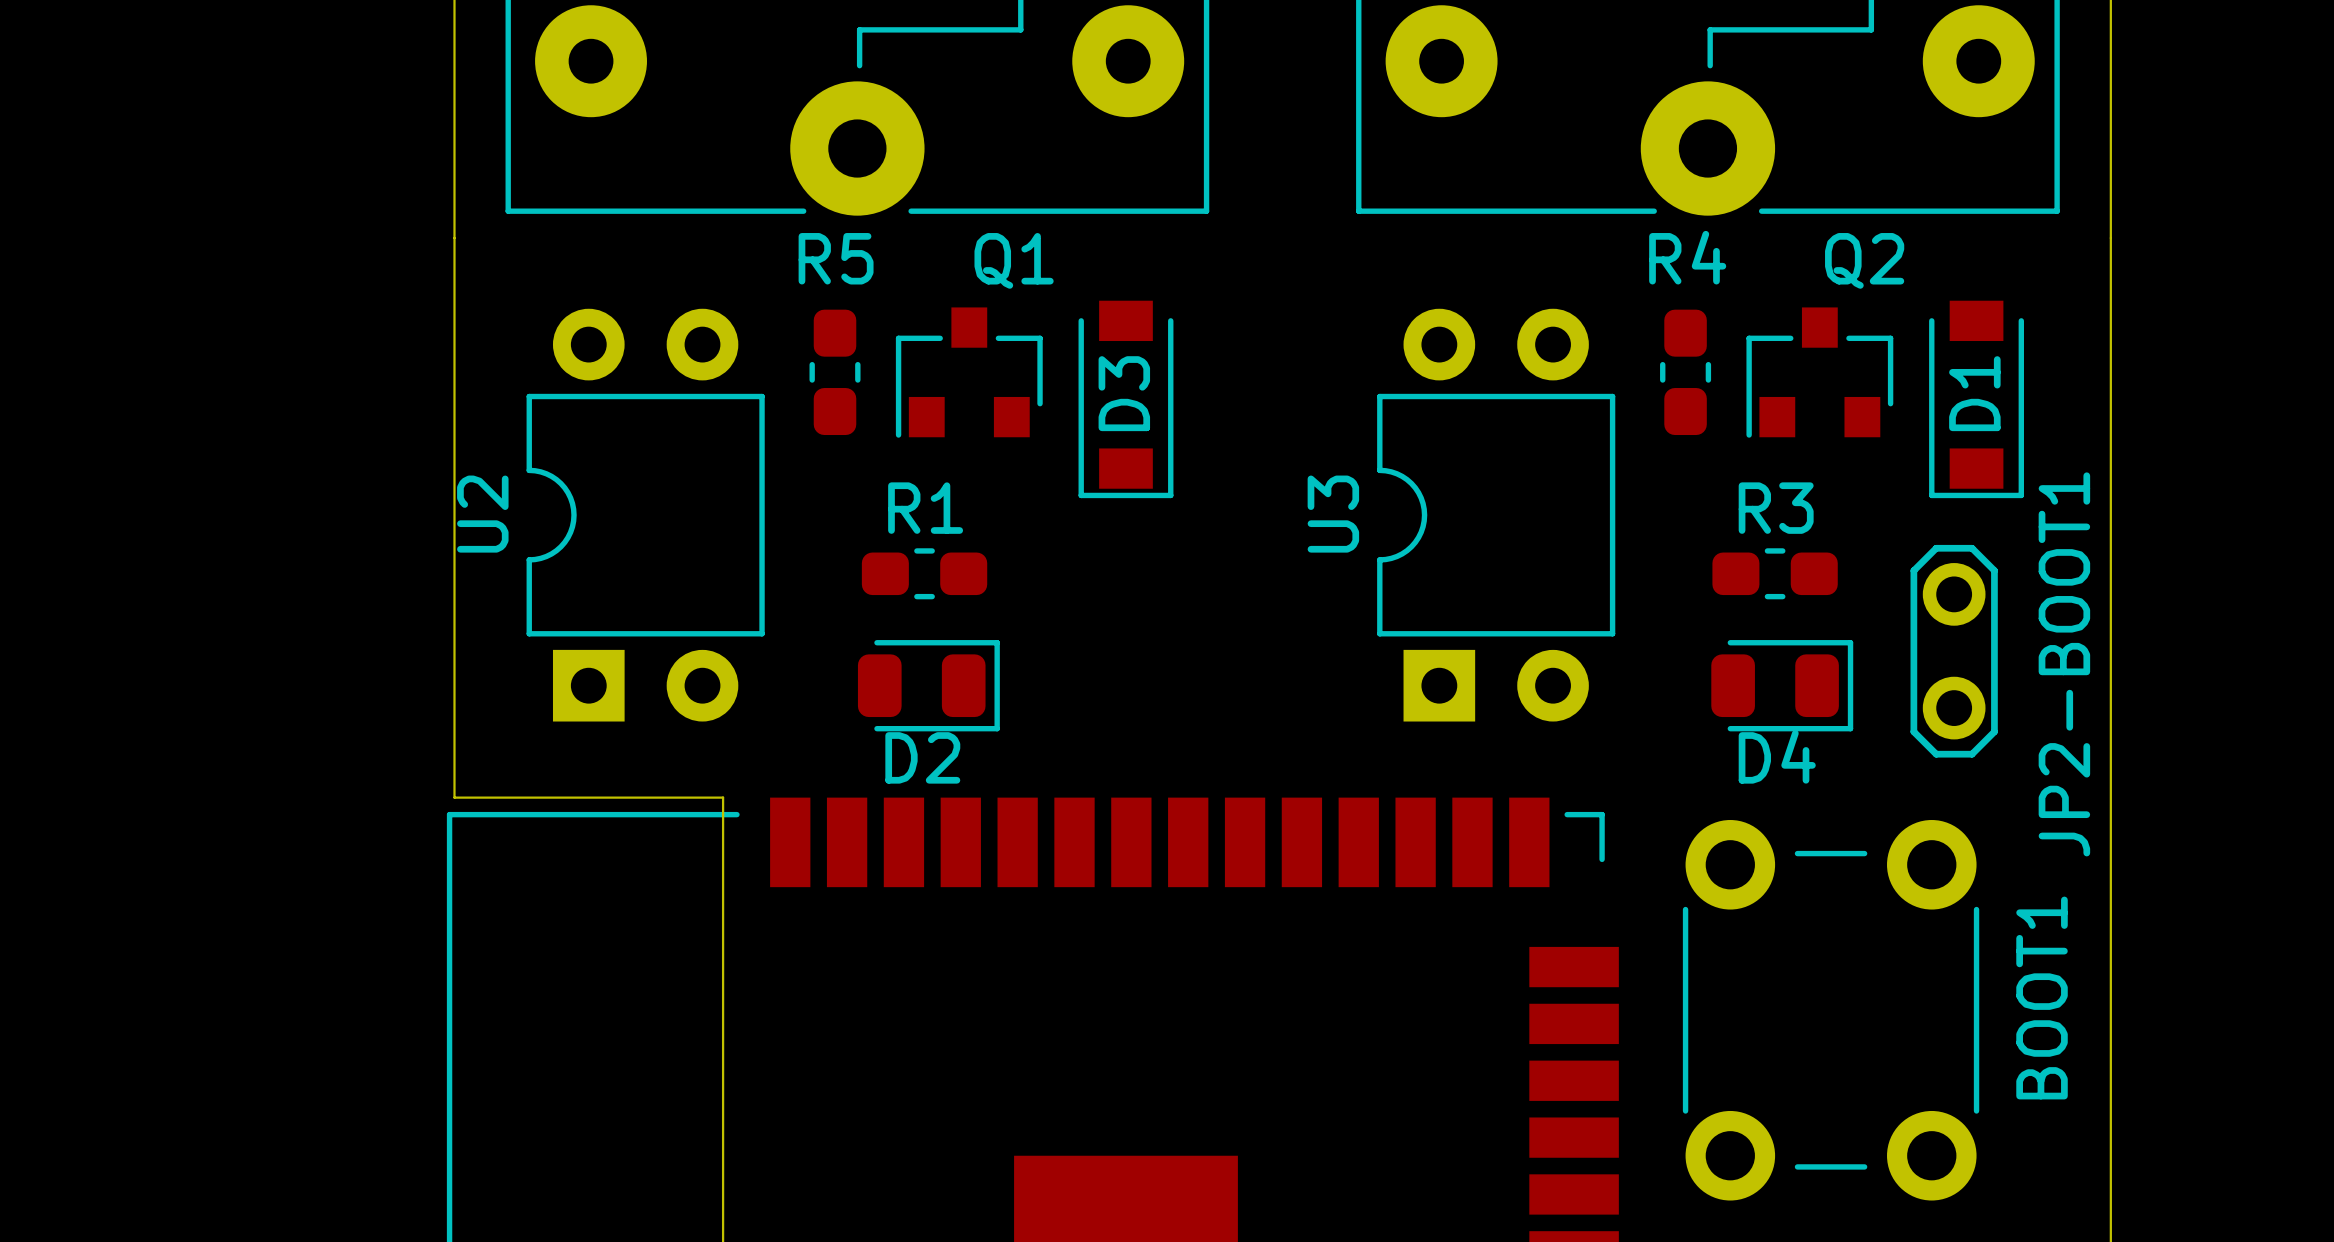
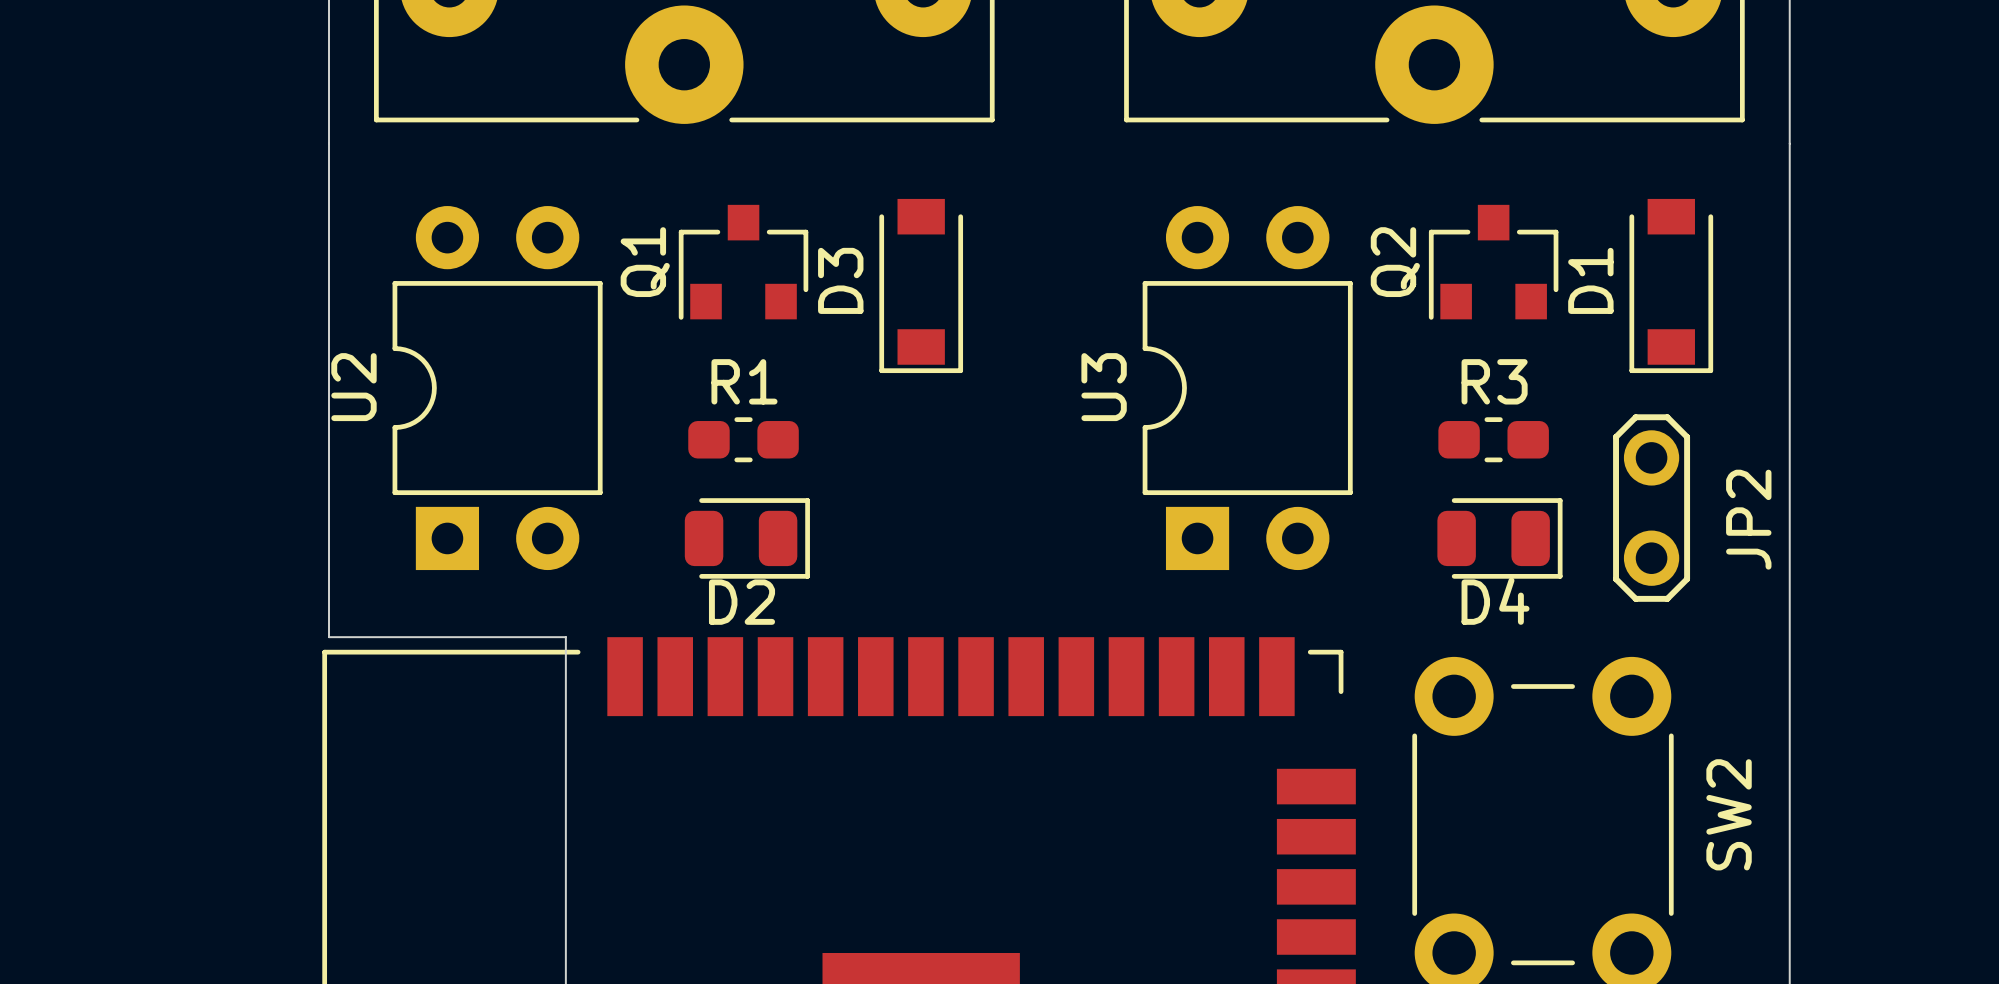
Q1 name rotation: 0° (1014, 260) -> 90° counterclockwise (645, 262)
Q1 name position: Q1 (1014, 260) -> Q1 (645, 262)
Q2 name rotation: 0° (1864, 260) -> 90° counterclockwise (1395, 262)
Q2 name position: Q2 (1864, 260) -> Q2 (1395, 262)
R5: (835, 372) -> none
Q1 position: (969, 372) -> (743, 262)
R4: (1685, 372) -> none
Q2 position: (1819, 372) -> (1493, 262)
D3 name position: D3 (1124, 393) -> D3 (840, 280)
D1 name position: D1 (1974, 393) -> D1 (1590, 280)
JP2-BOOT1 name: JP2-BOOT1 (2064, 664) -> JP2 (1748, 519)
BOOT1 name: BOOT1 (2042, 998) -> SW2 (1729, 814)

